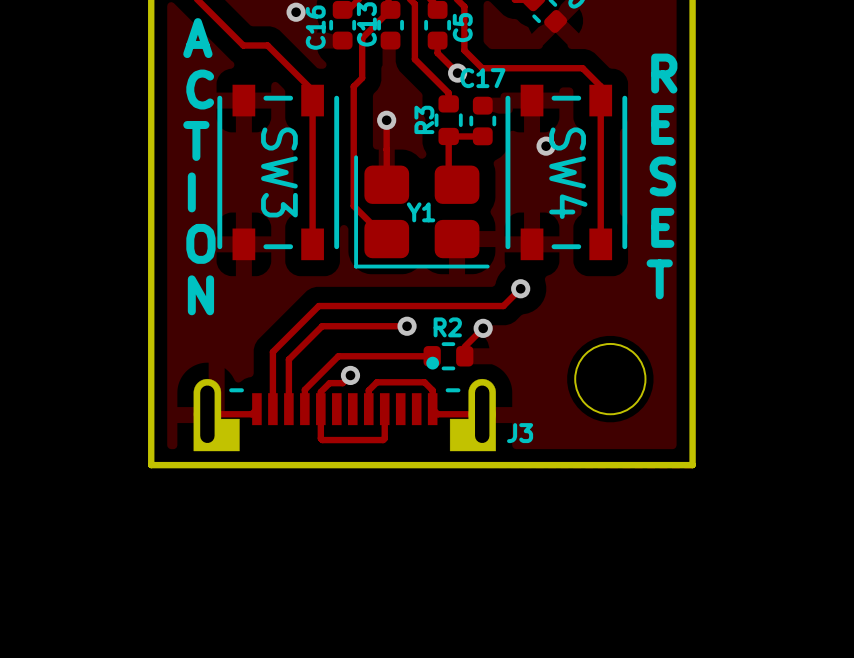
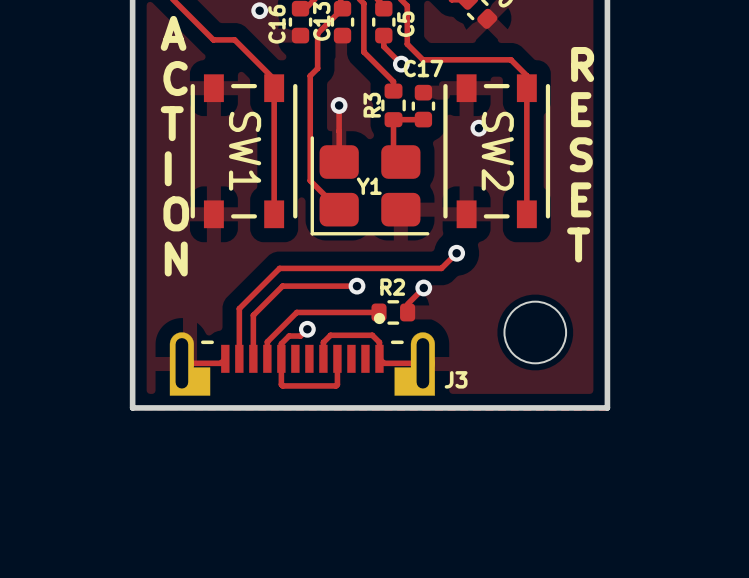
SW3 name: SW3 (279, 172) -> SW1 (245, 151)
SW4 name: SW4 (568, 173) -> SW2 (497, 151)

